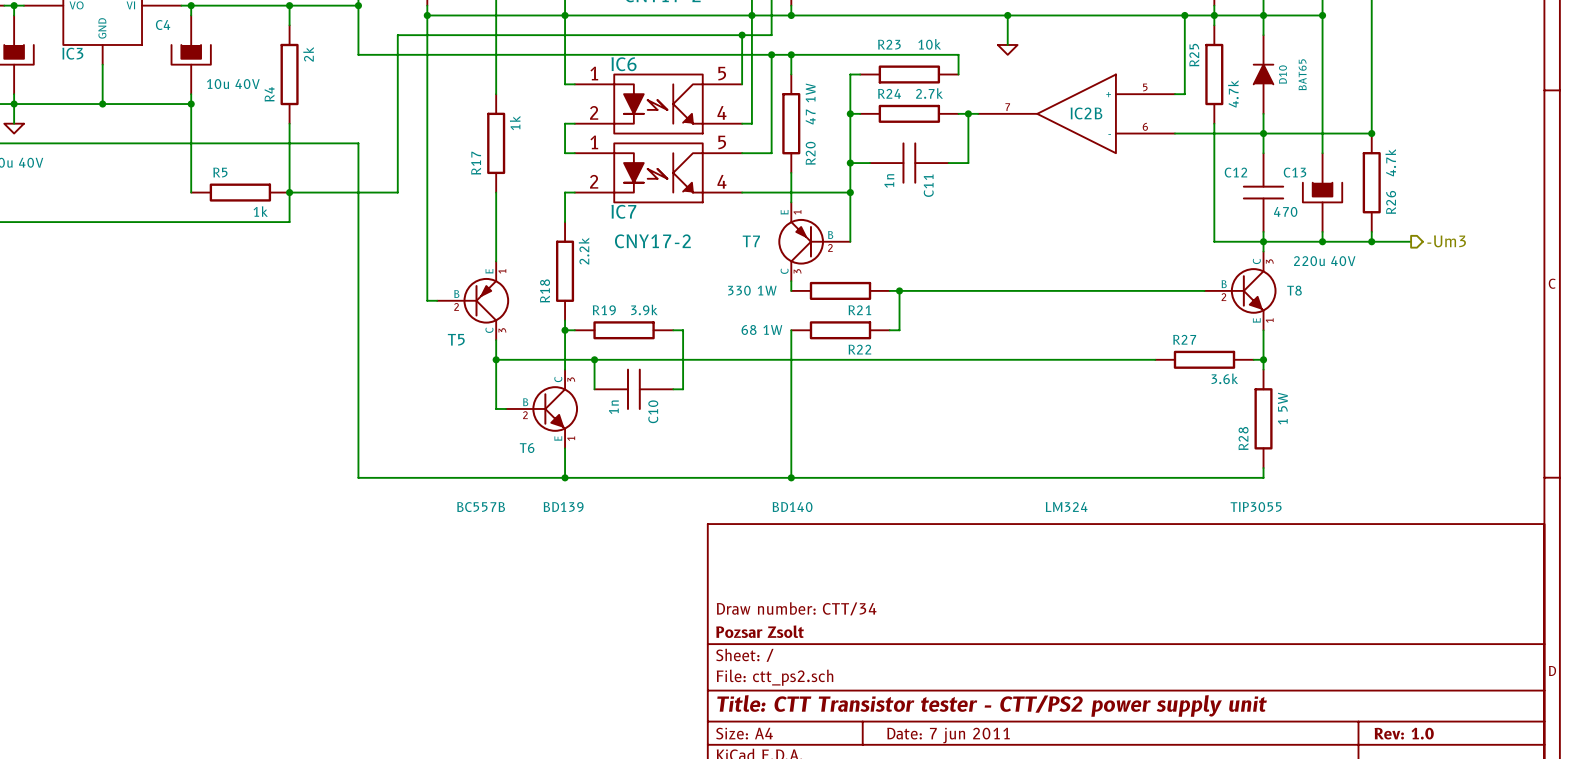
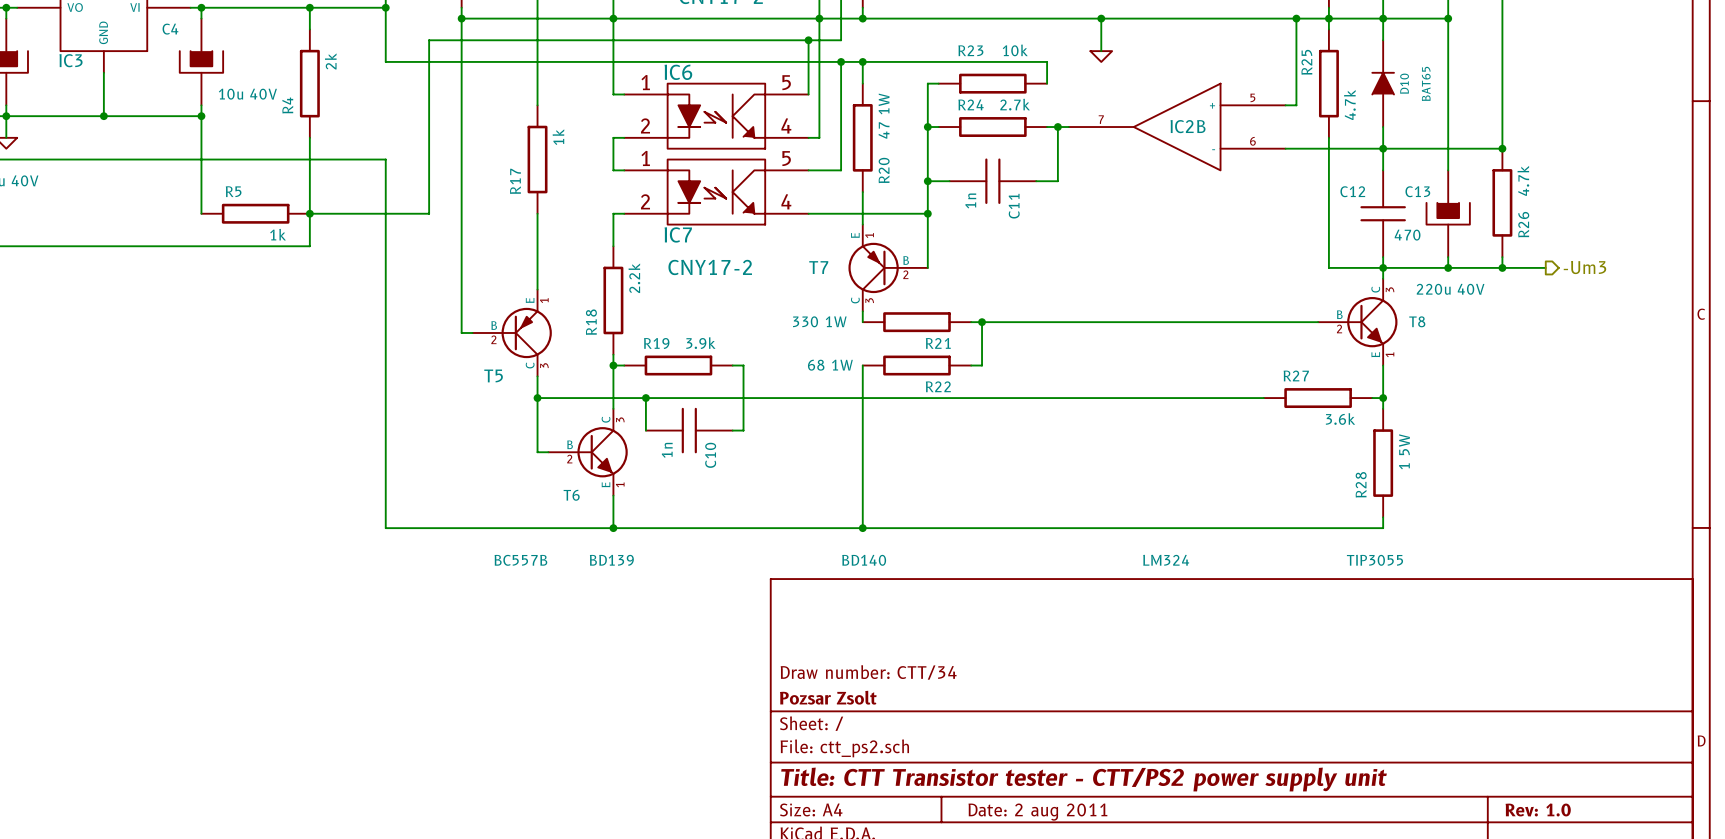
title block: Date: 7 jun 2011 (948, 735) -> Date: 2 aug 2011 (1037, 812)

